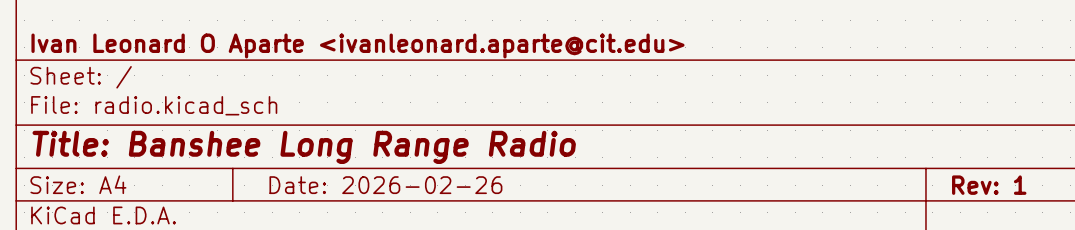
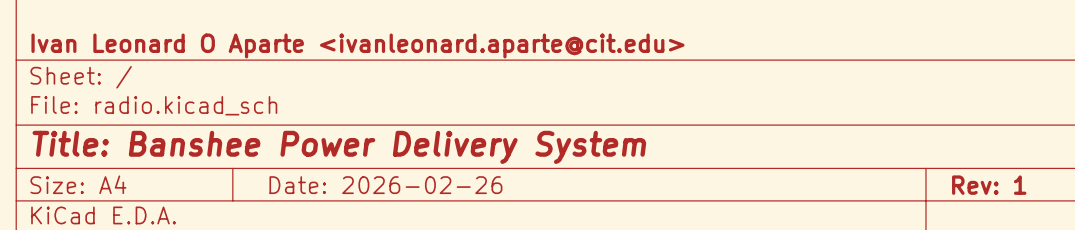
title block: Title: Banshee Long Range Radio (304, 147) -> Title: Banshee Power Delivery System (339, 147)

